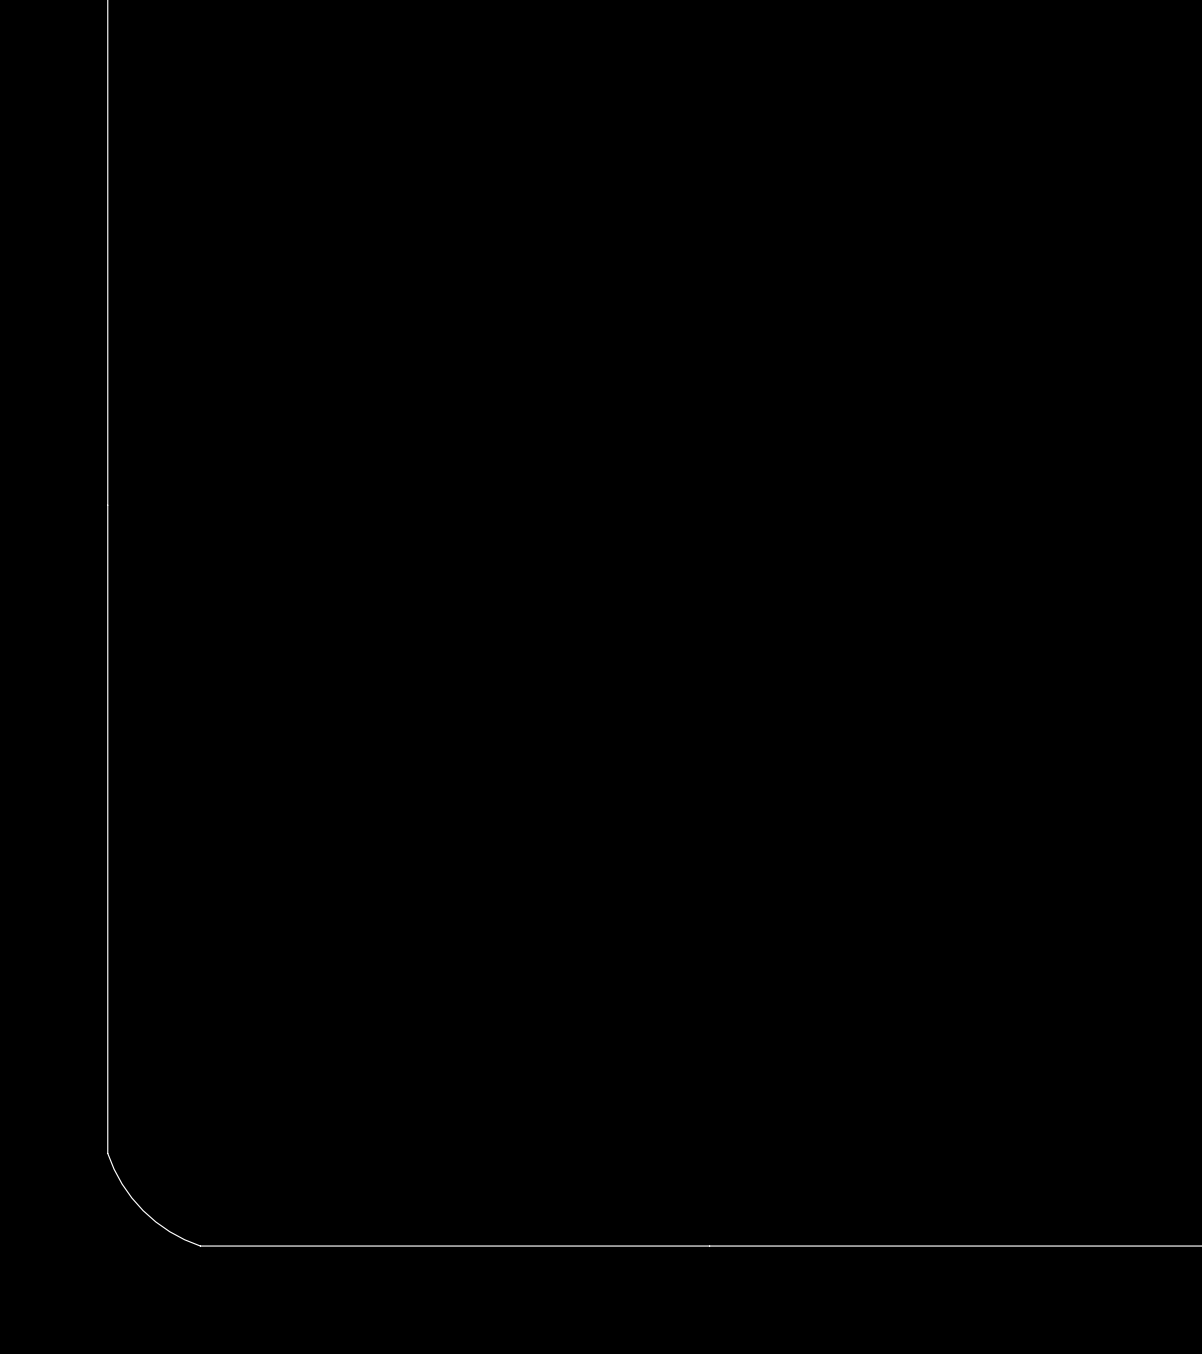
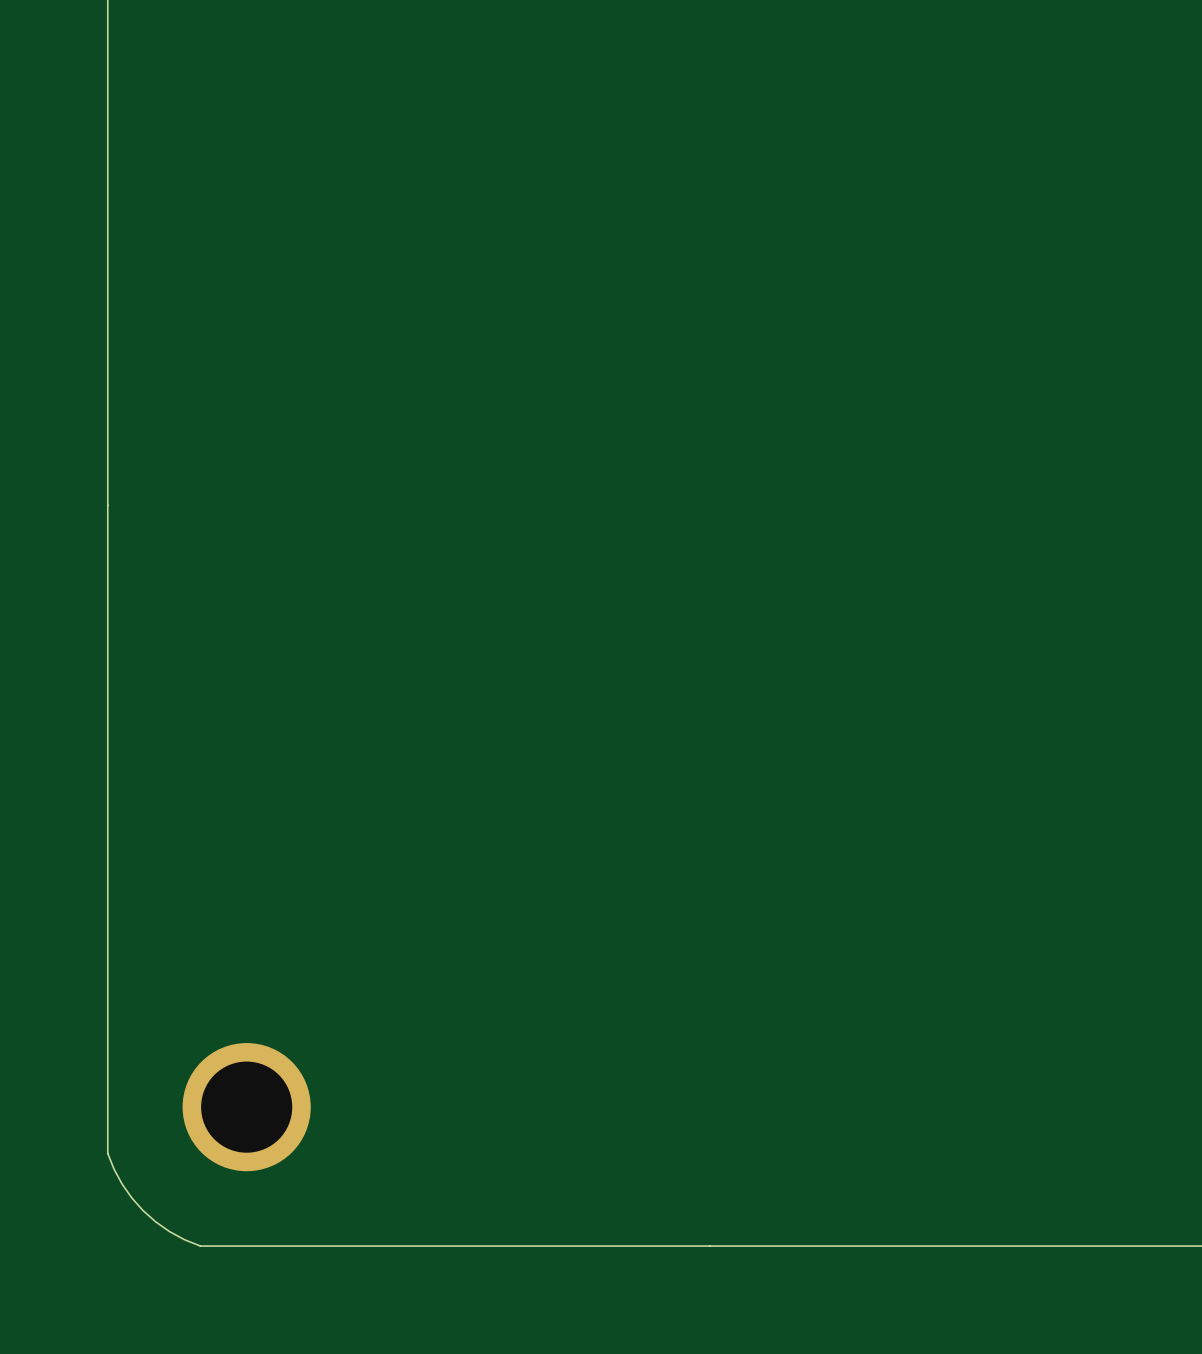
part: none -> (246, 1107)

